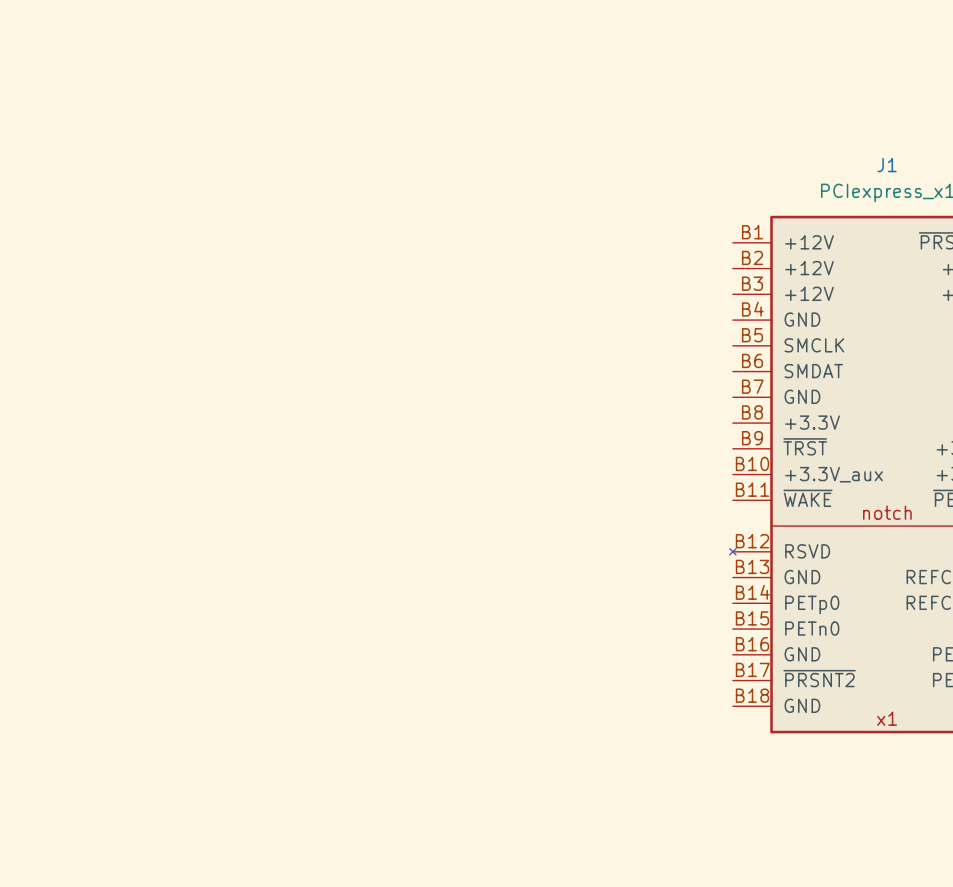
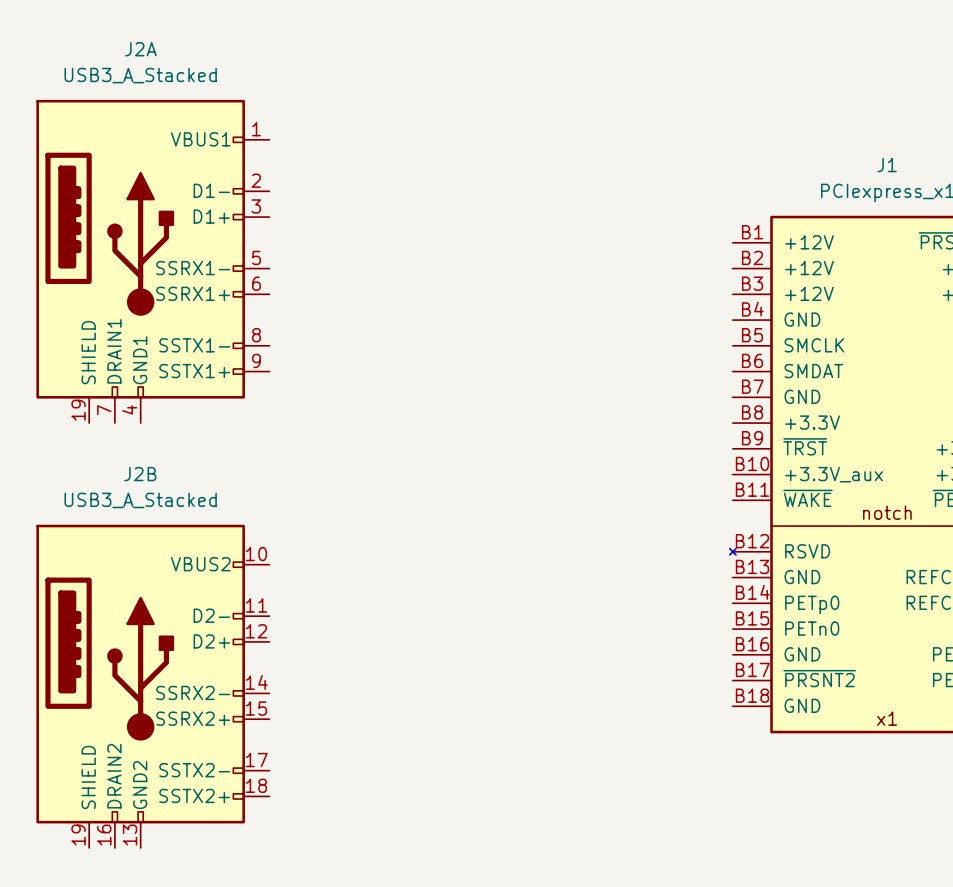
J2A: none -> USB3_A_Stacked (152, 261)
J2B: none -> USB3_A_Stacked (152, 686)

